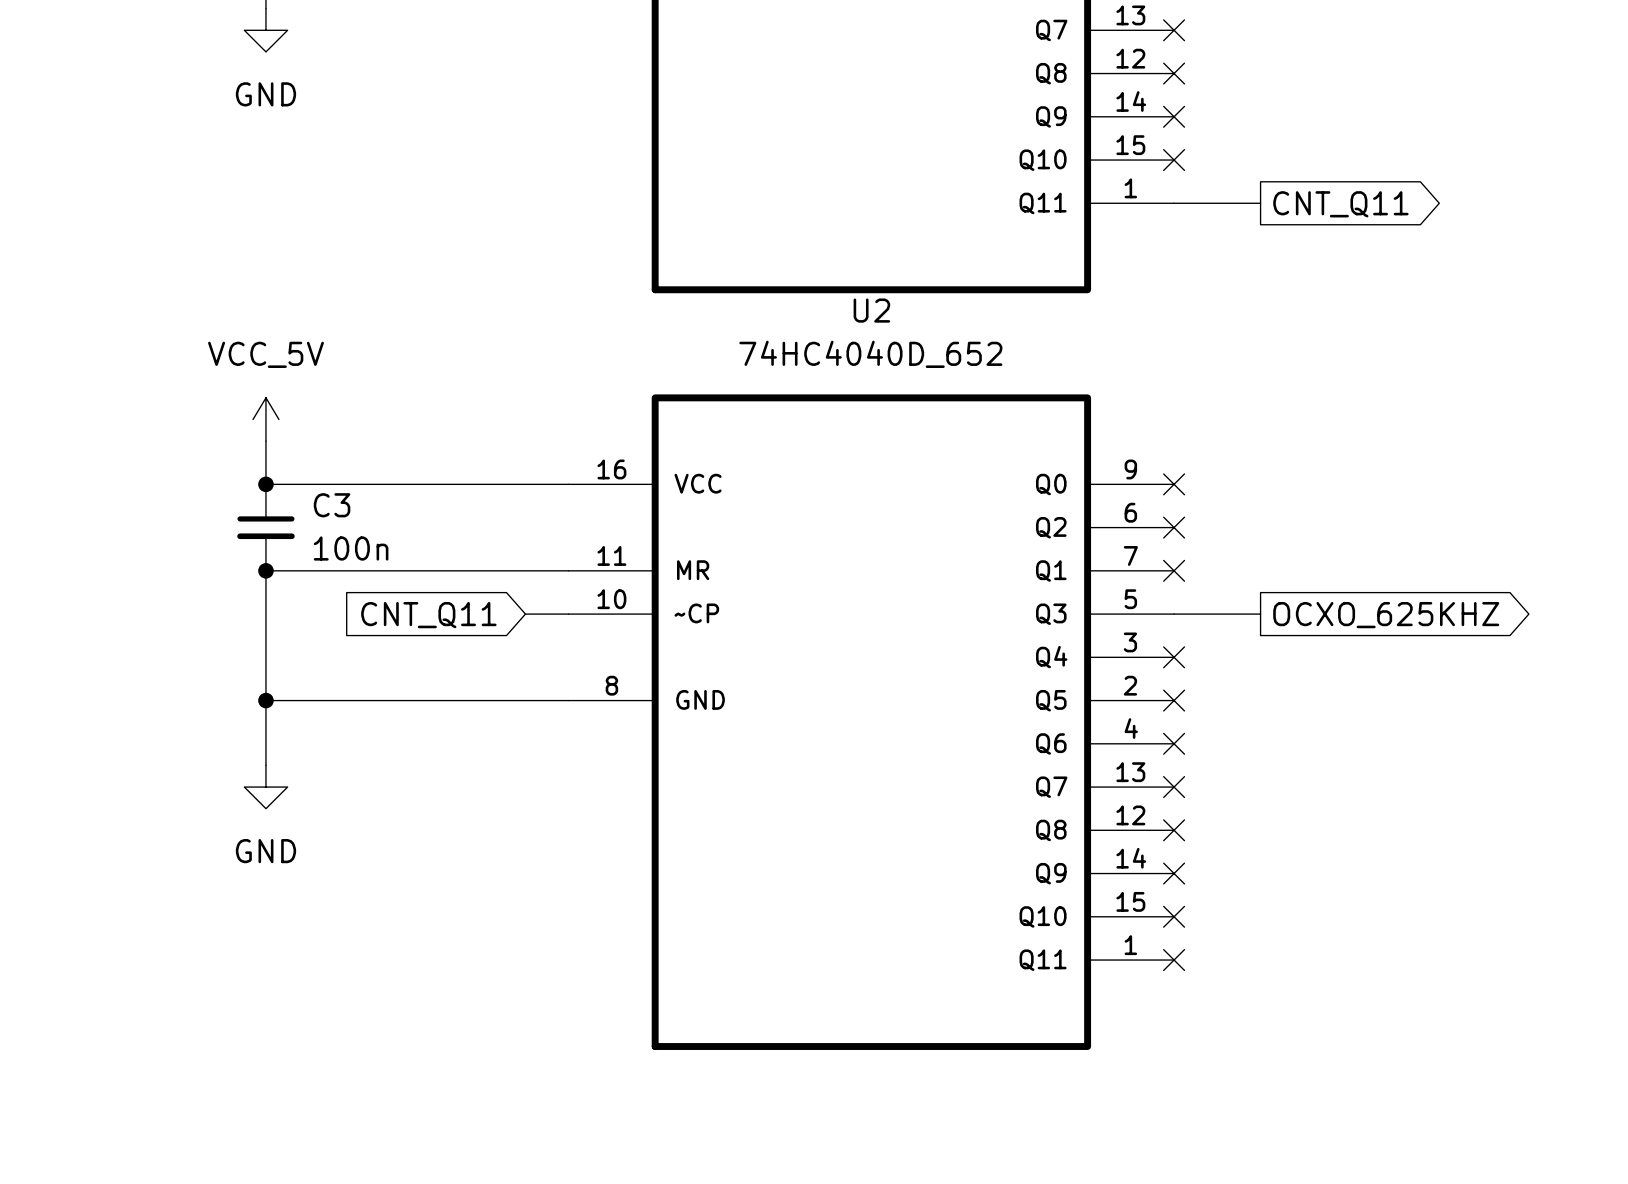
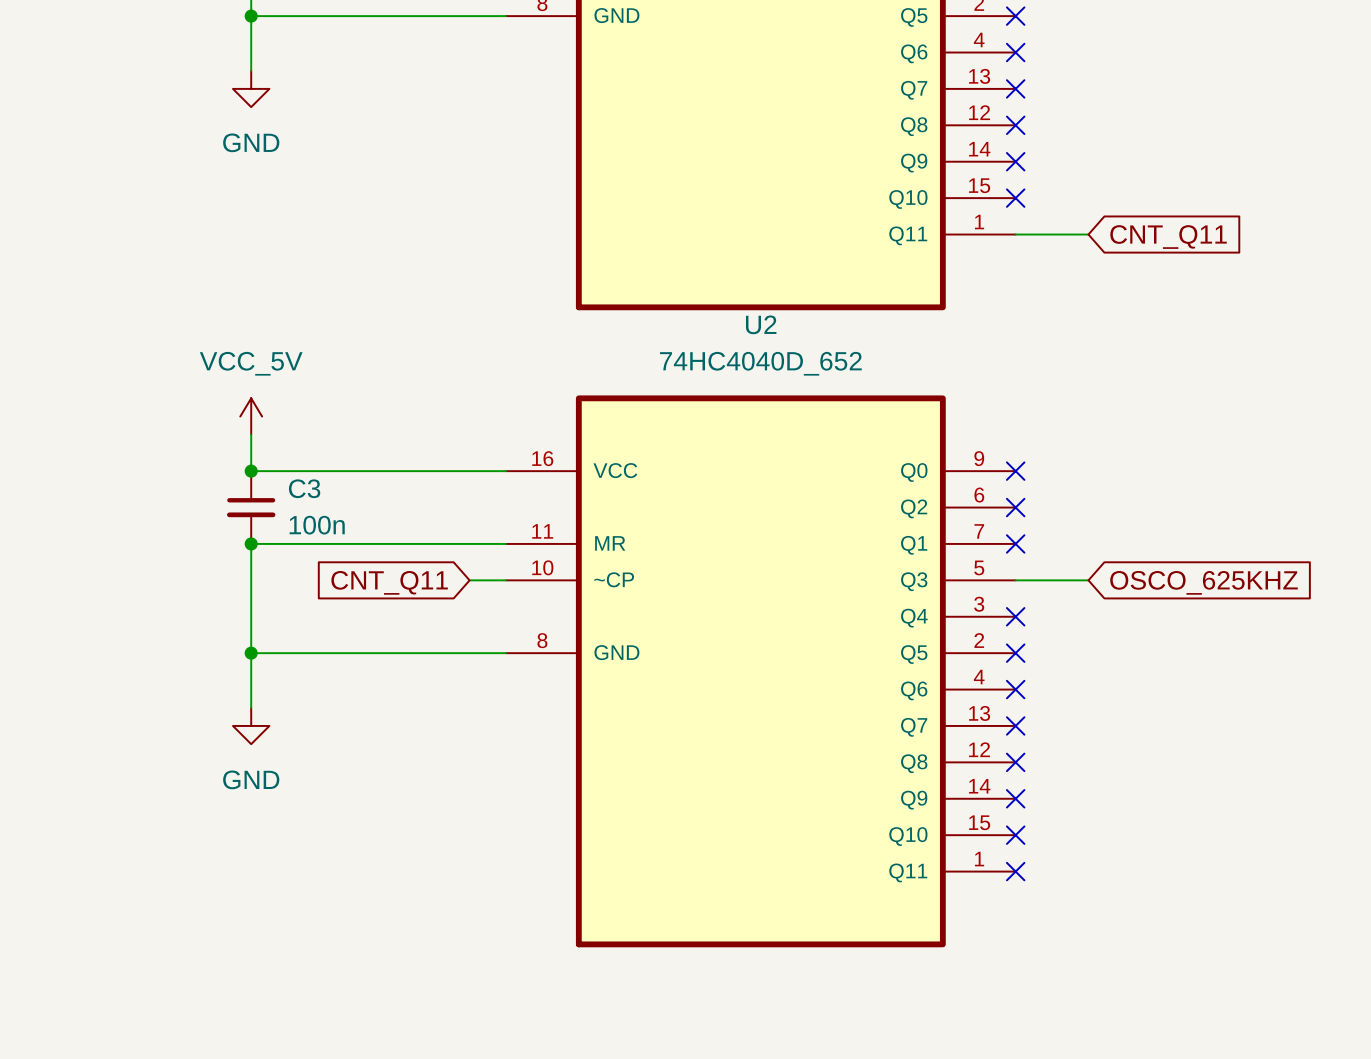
global label shape: output (1340, 204) -> input (1168, 237)
global label shape: output (1386, 615) -> input (1204, 582)
global label: OCXO_625KHZ (1386, 615) -> OSCO_625KHZ (1204, 582)

